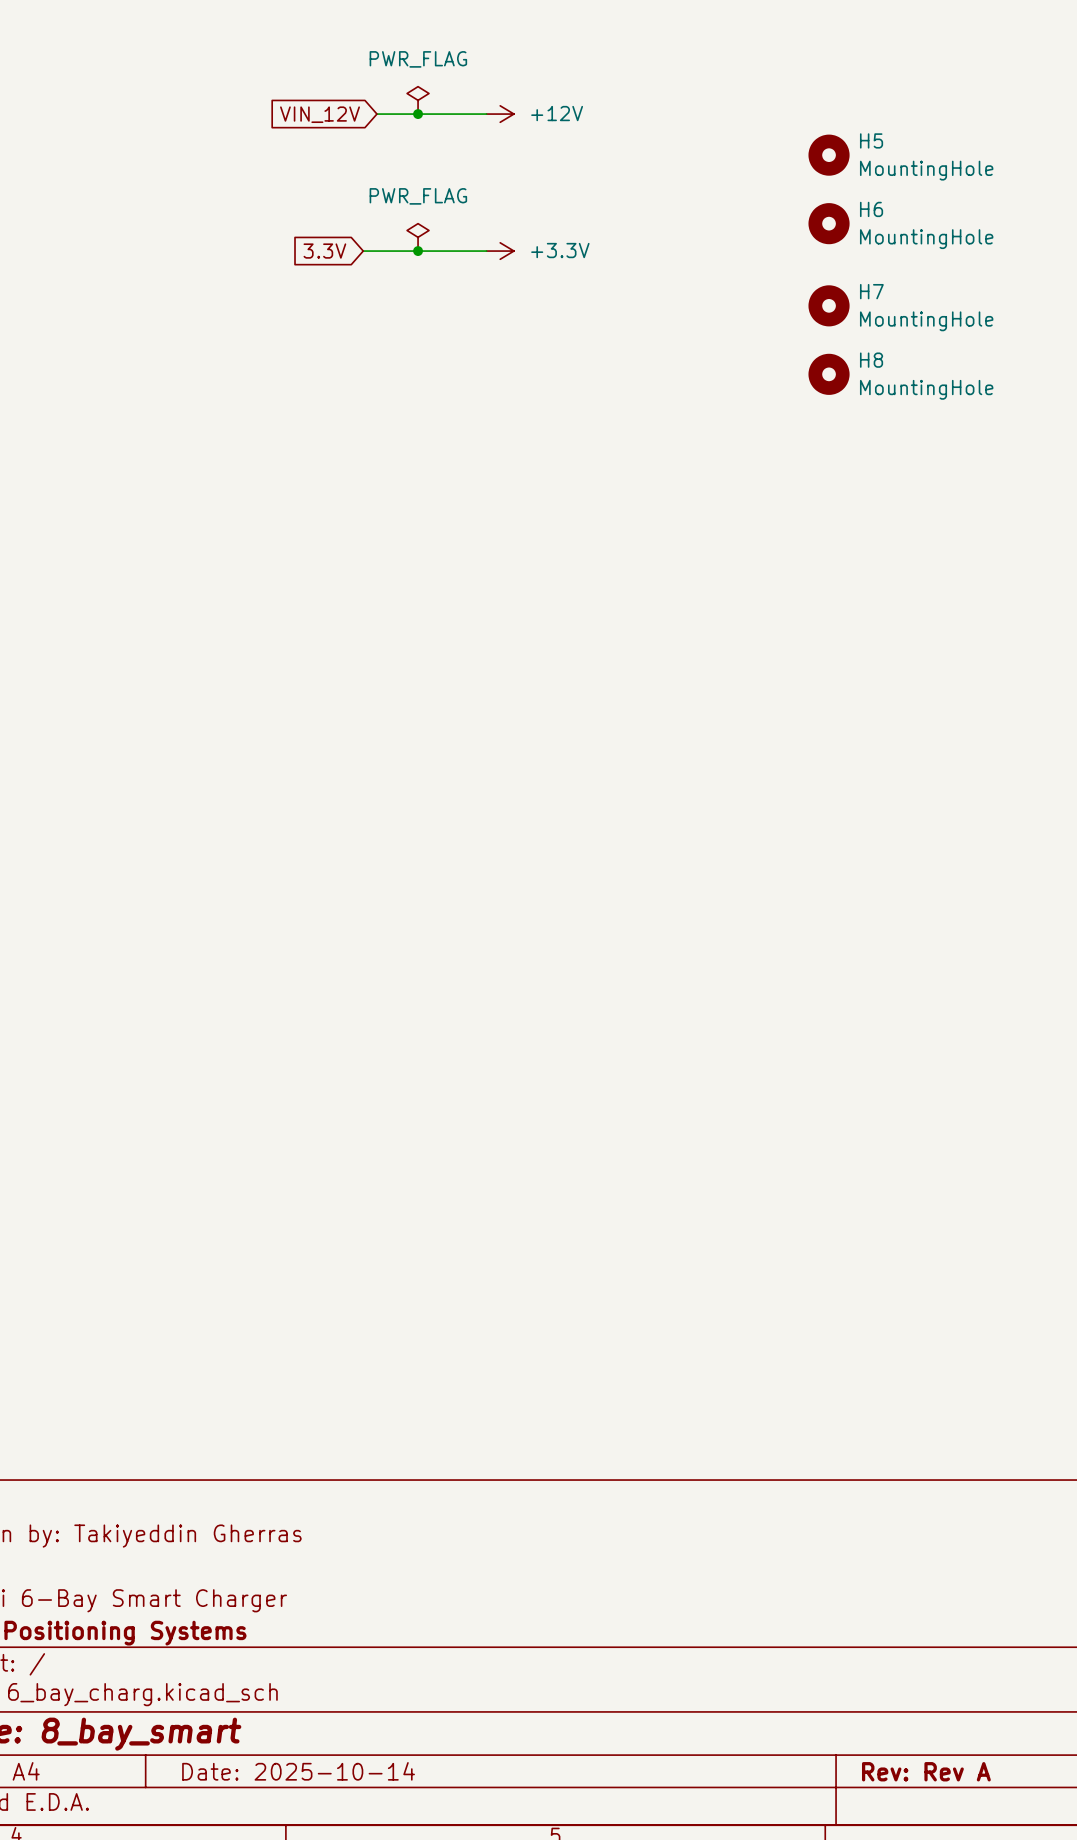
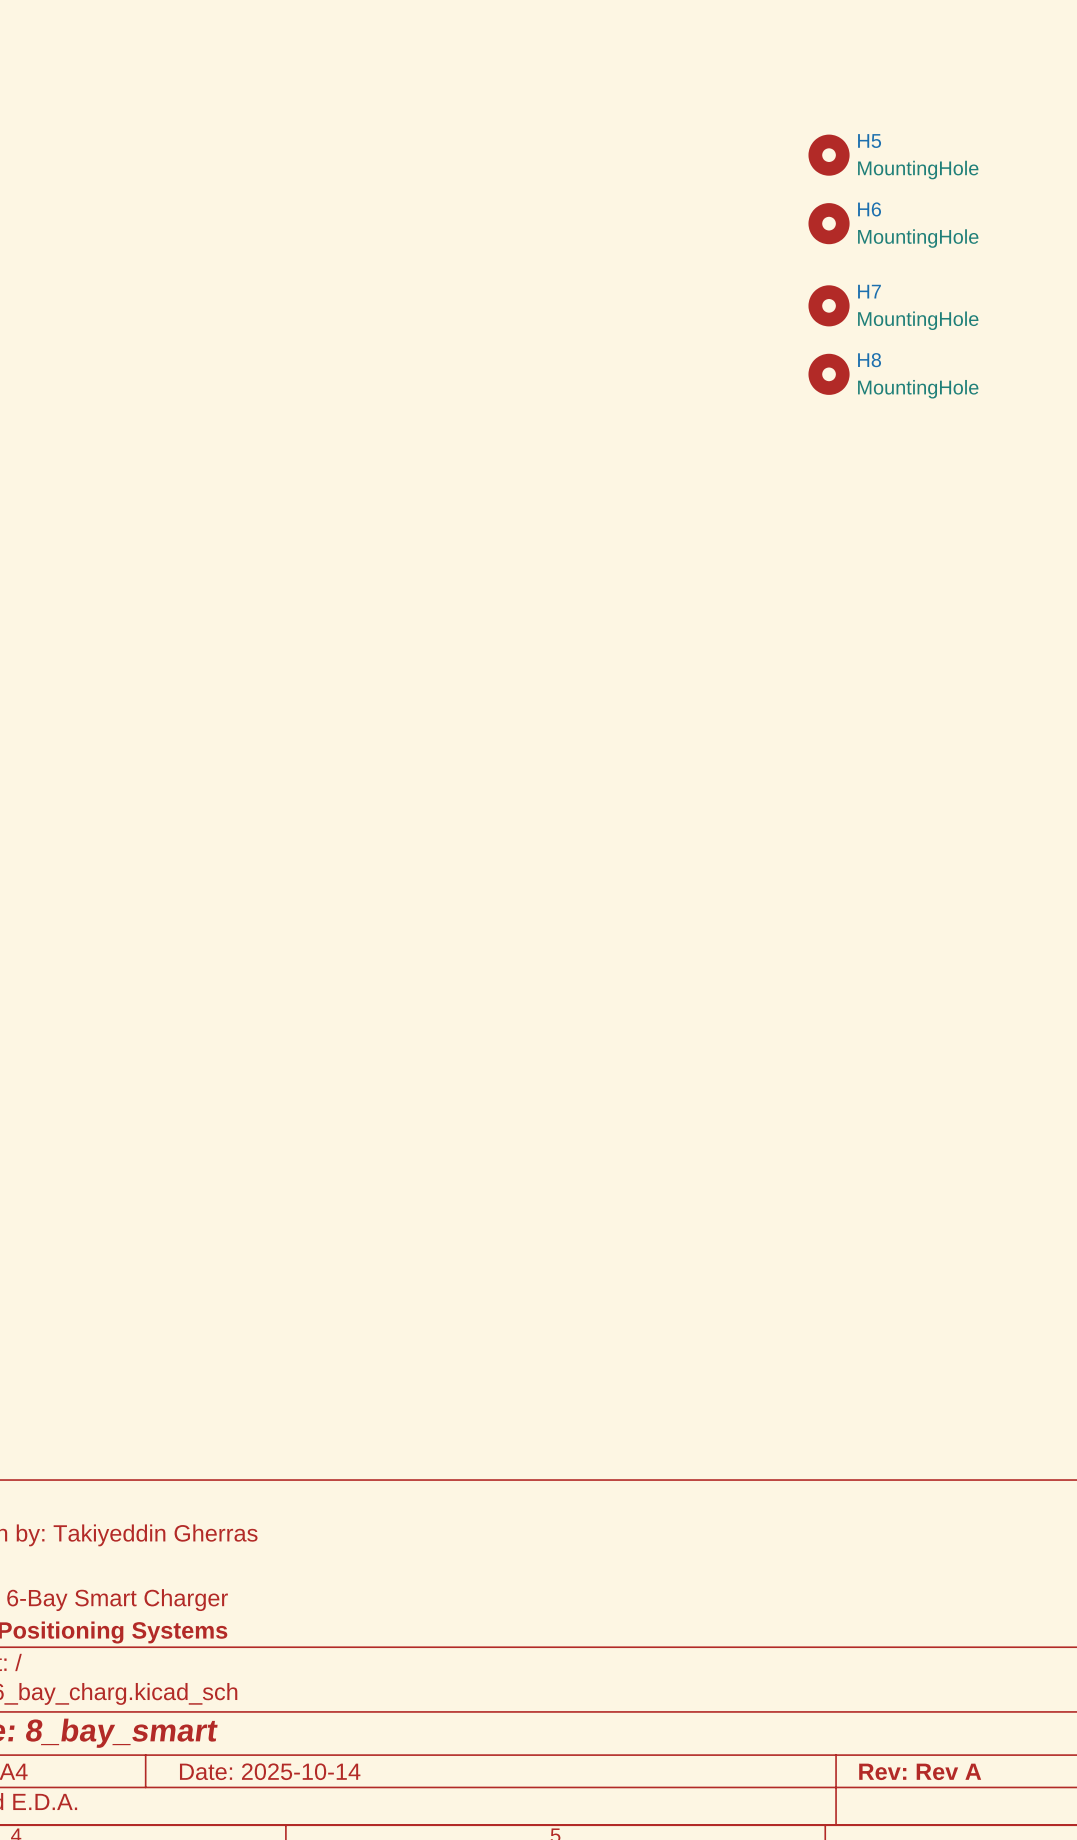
power symbol: PWR_FLAG (418, 100) -> none
global label: VIN_12V (320, 114) -> none
wire: (376, 114) (486, 114) -> none
junction: (418, 114) -> none
power symbol: +12V (500, 114) -> none
power symbol: PWR_FLAG (418, 237) -> none
global label: 3.3V (324, 251) -> none
wire: (363, 251) (486, 251) -> none
junction: (418, 251) -> none
power symbol: +3.3V (500, 251) -> none

